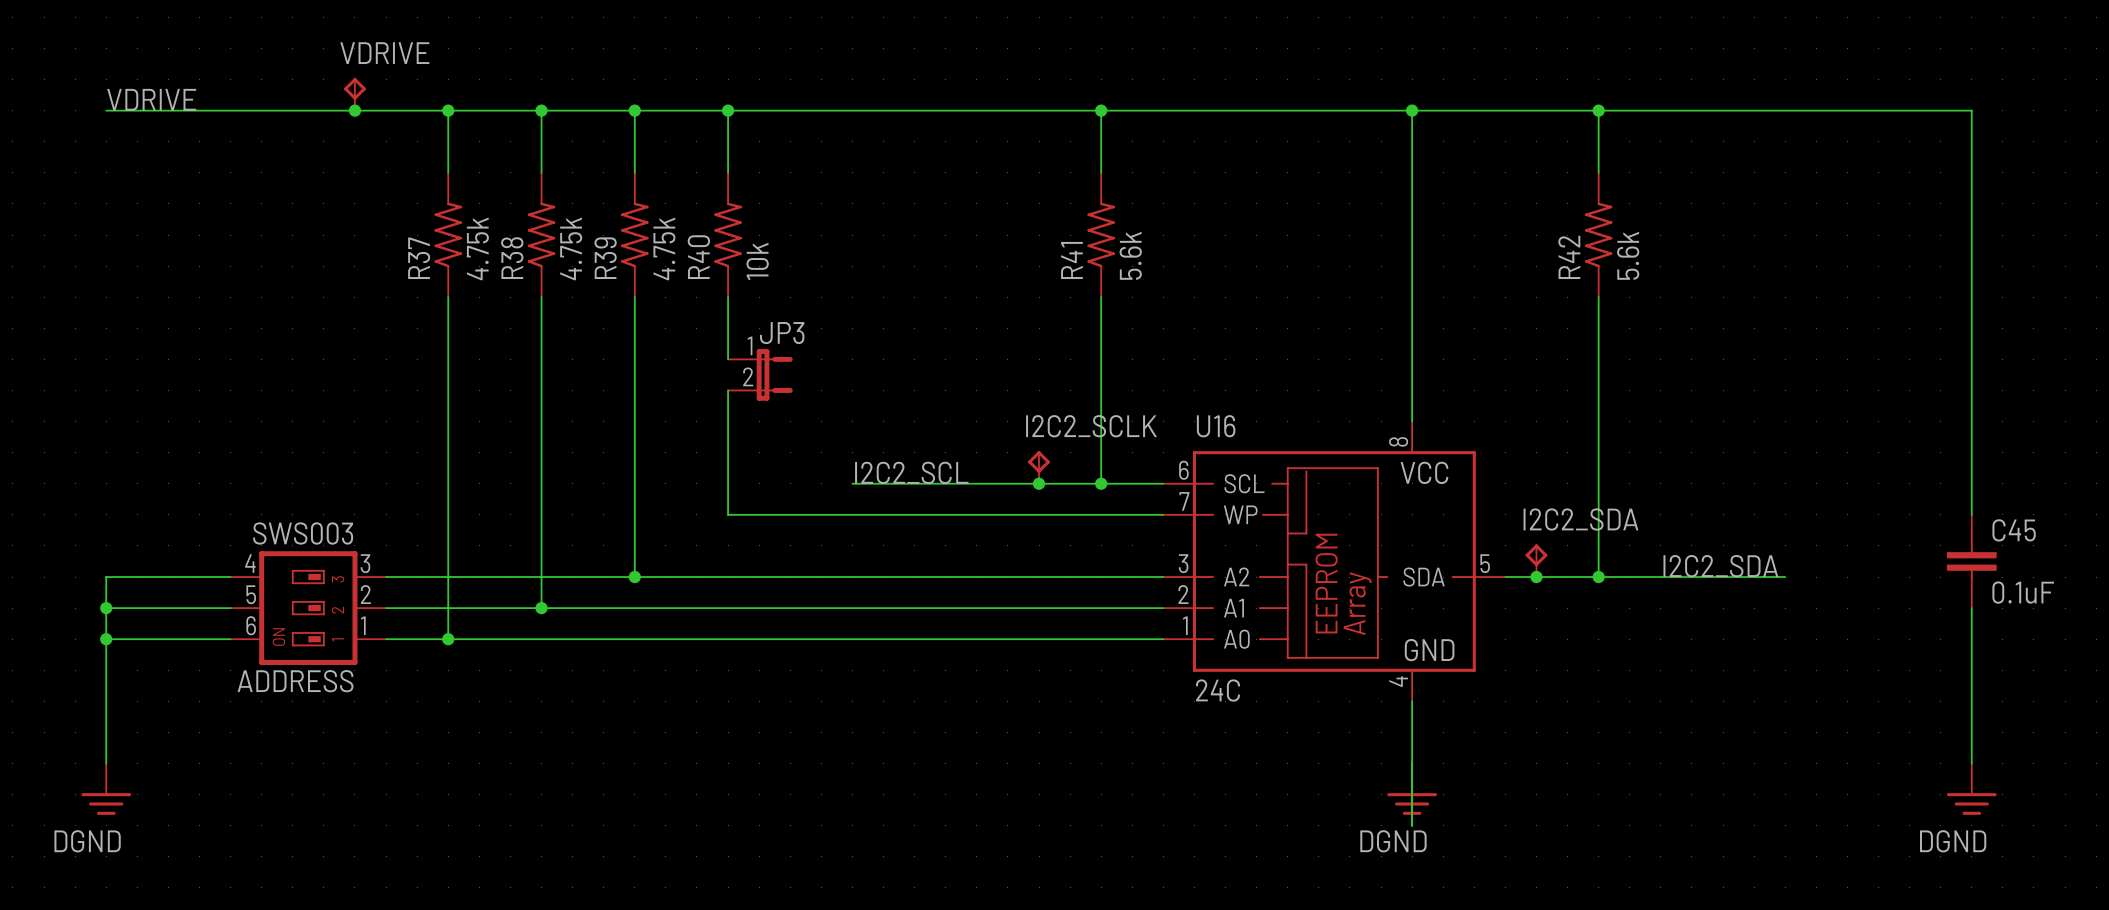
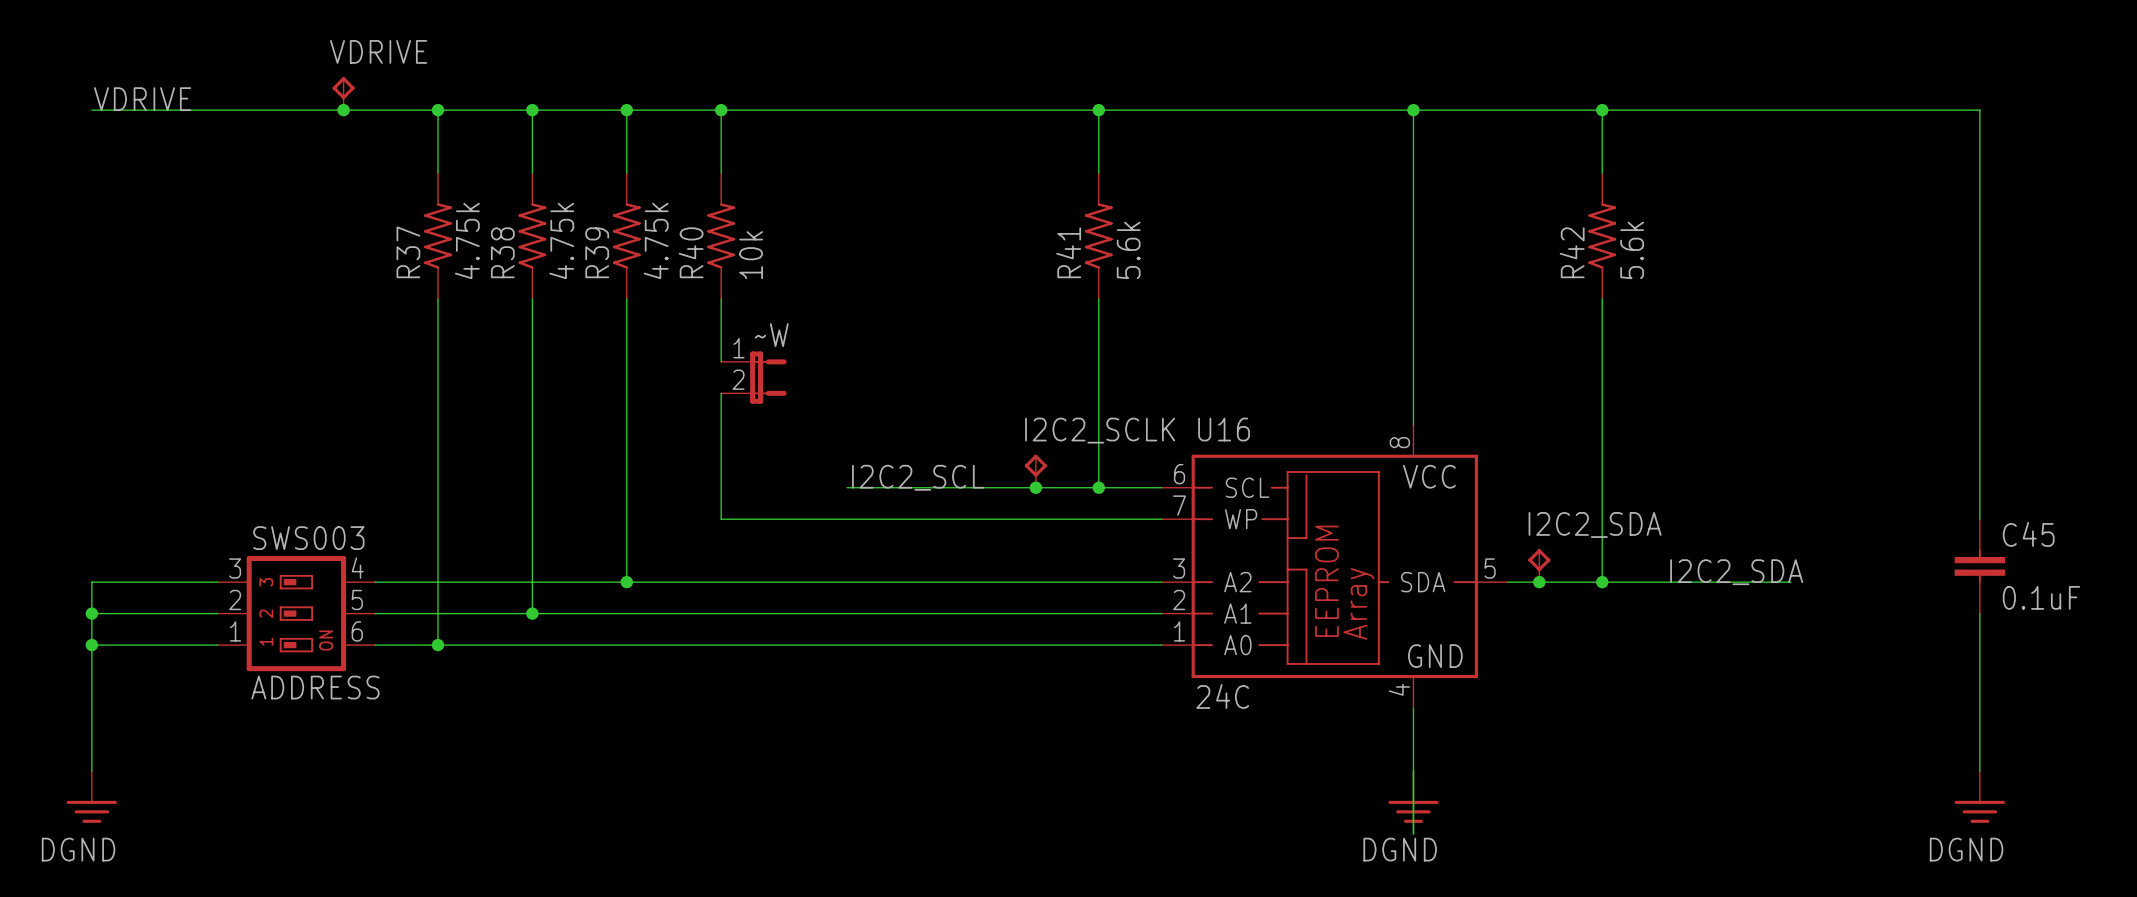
JP3 name: JP3 (782, 333) -> ~W (771, 335)
ADDRESS value position: SWS003 (303, 533) -> SWS003 (308, 538)
ADDRESS symbol: [230, 551, 387, 666] -> [217, 556, 376, 672]
ADDRESS name position: ADDRESS (295, 681) -> ADDRESS (315, 687)

